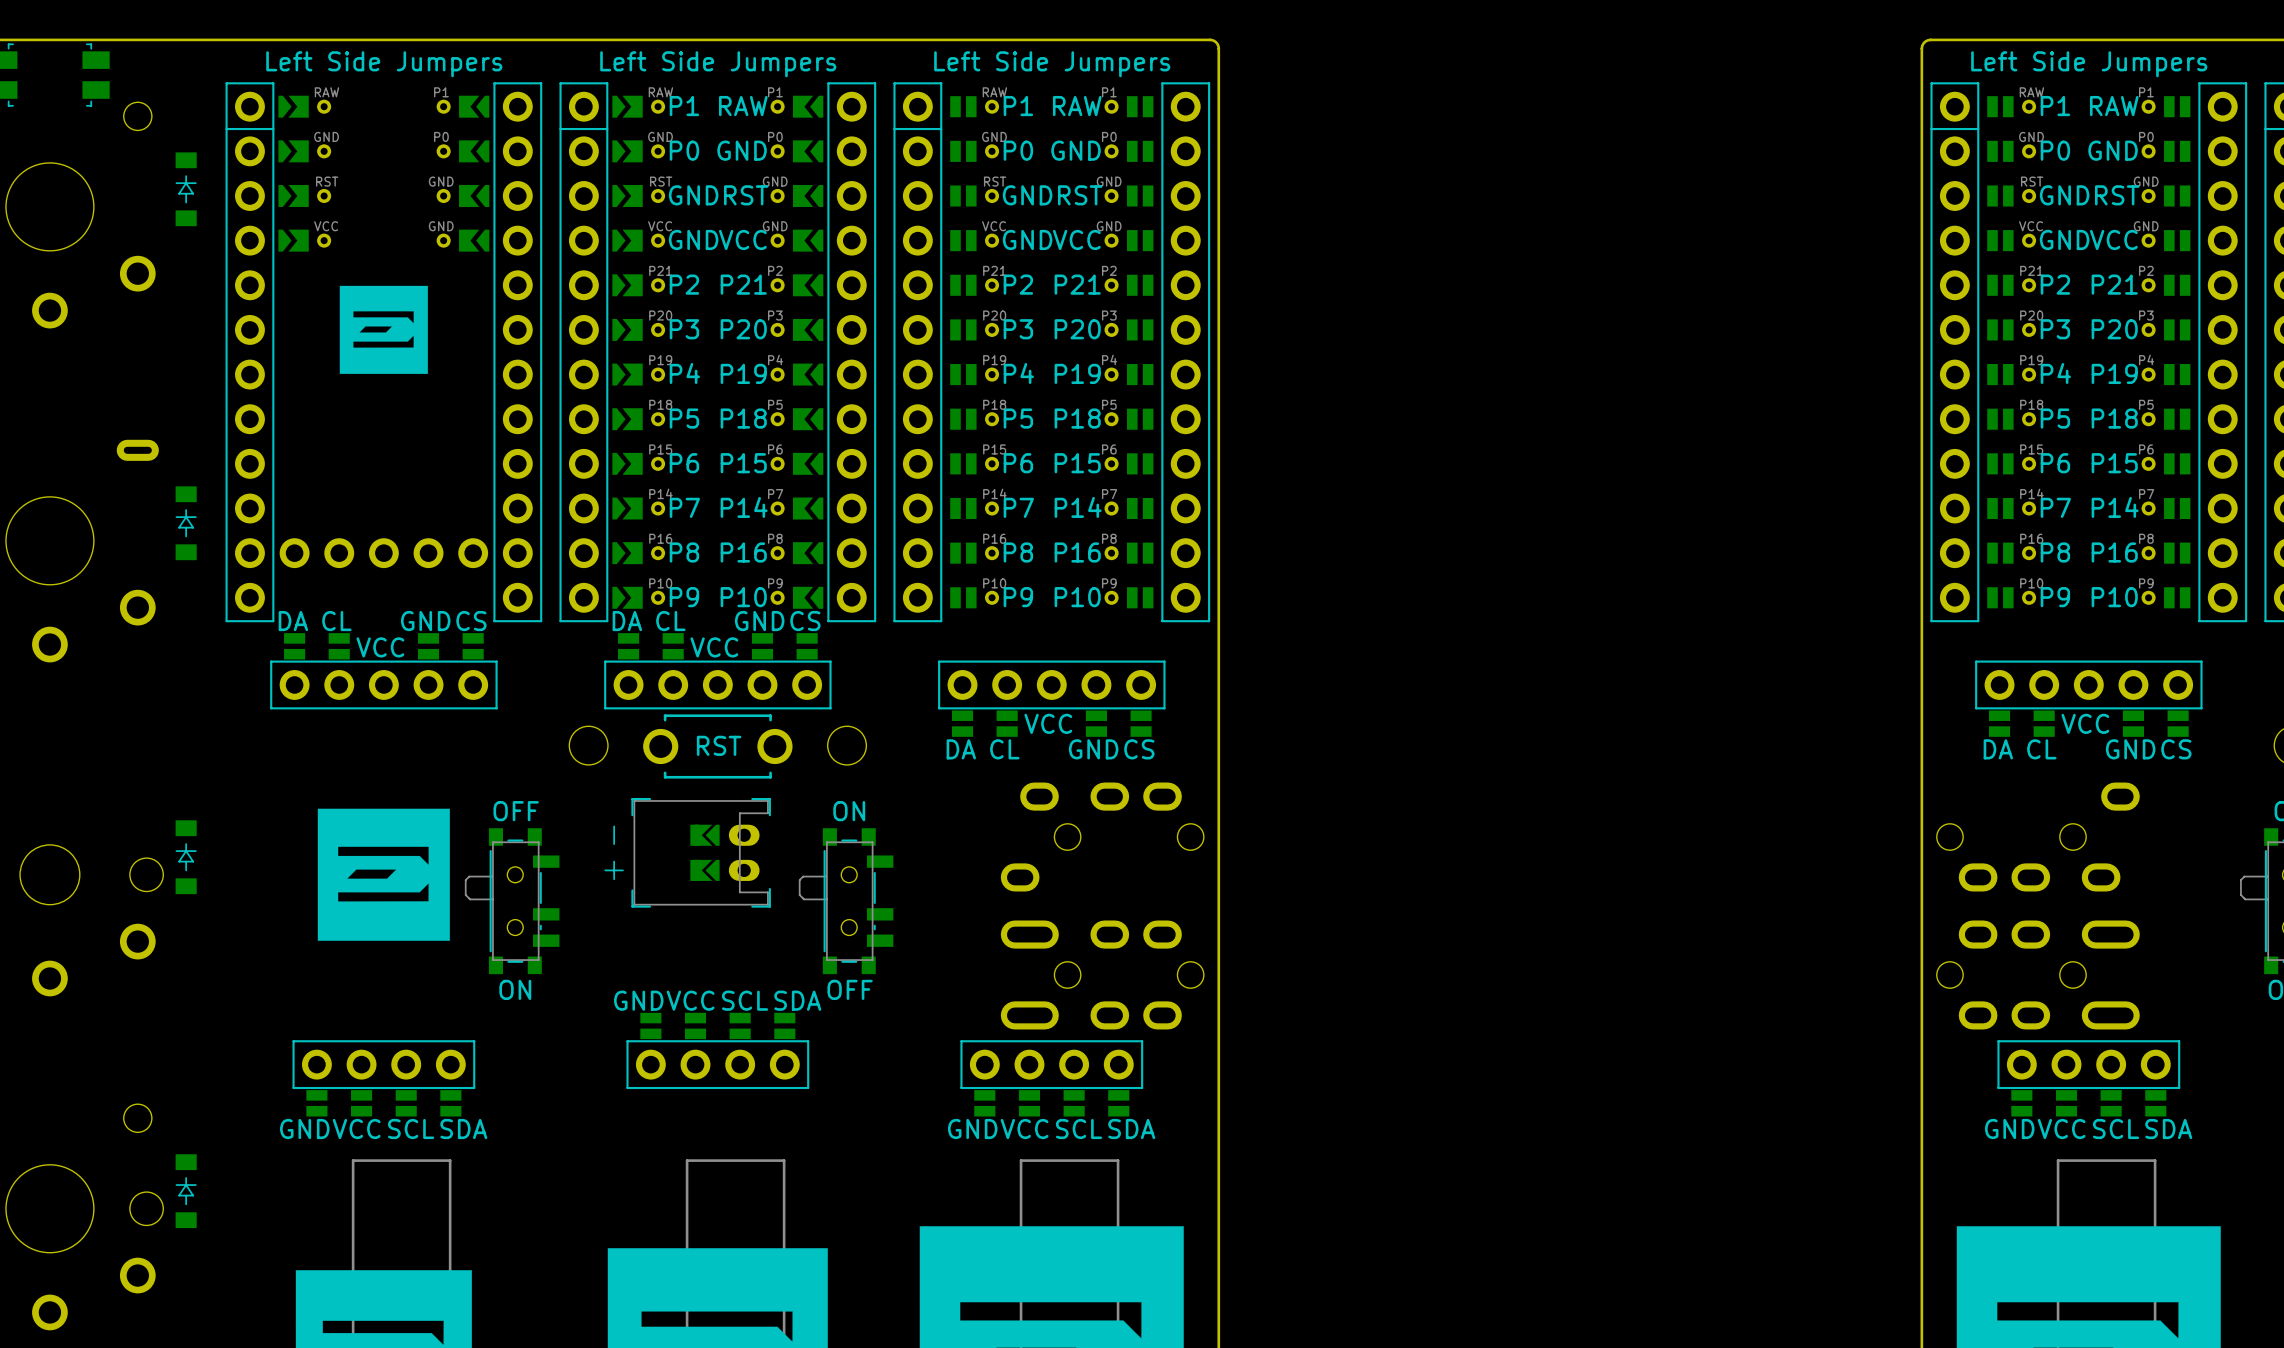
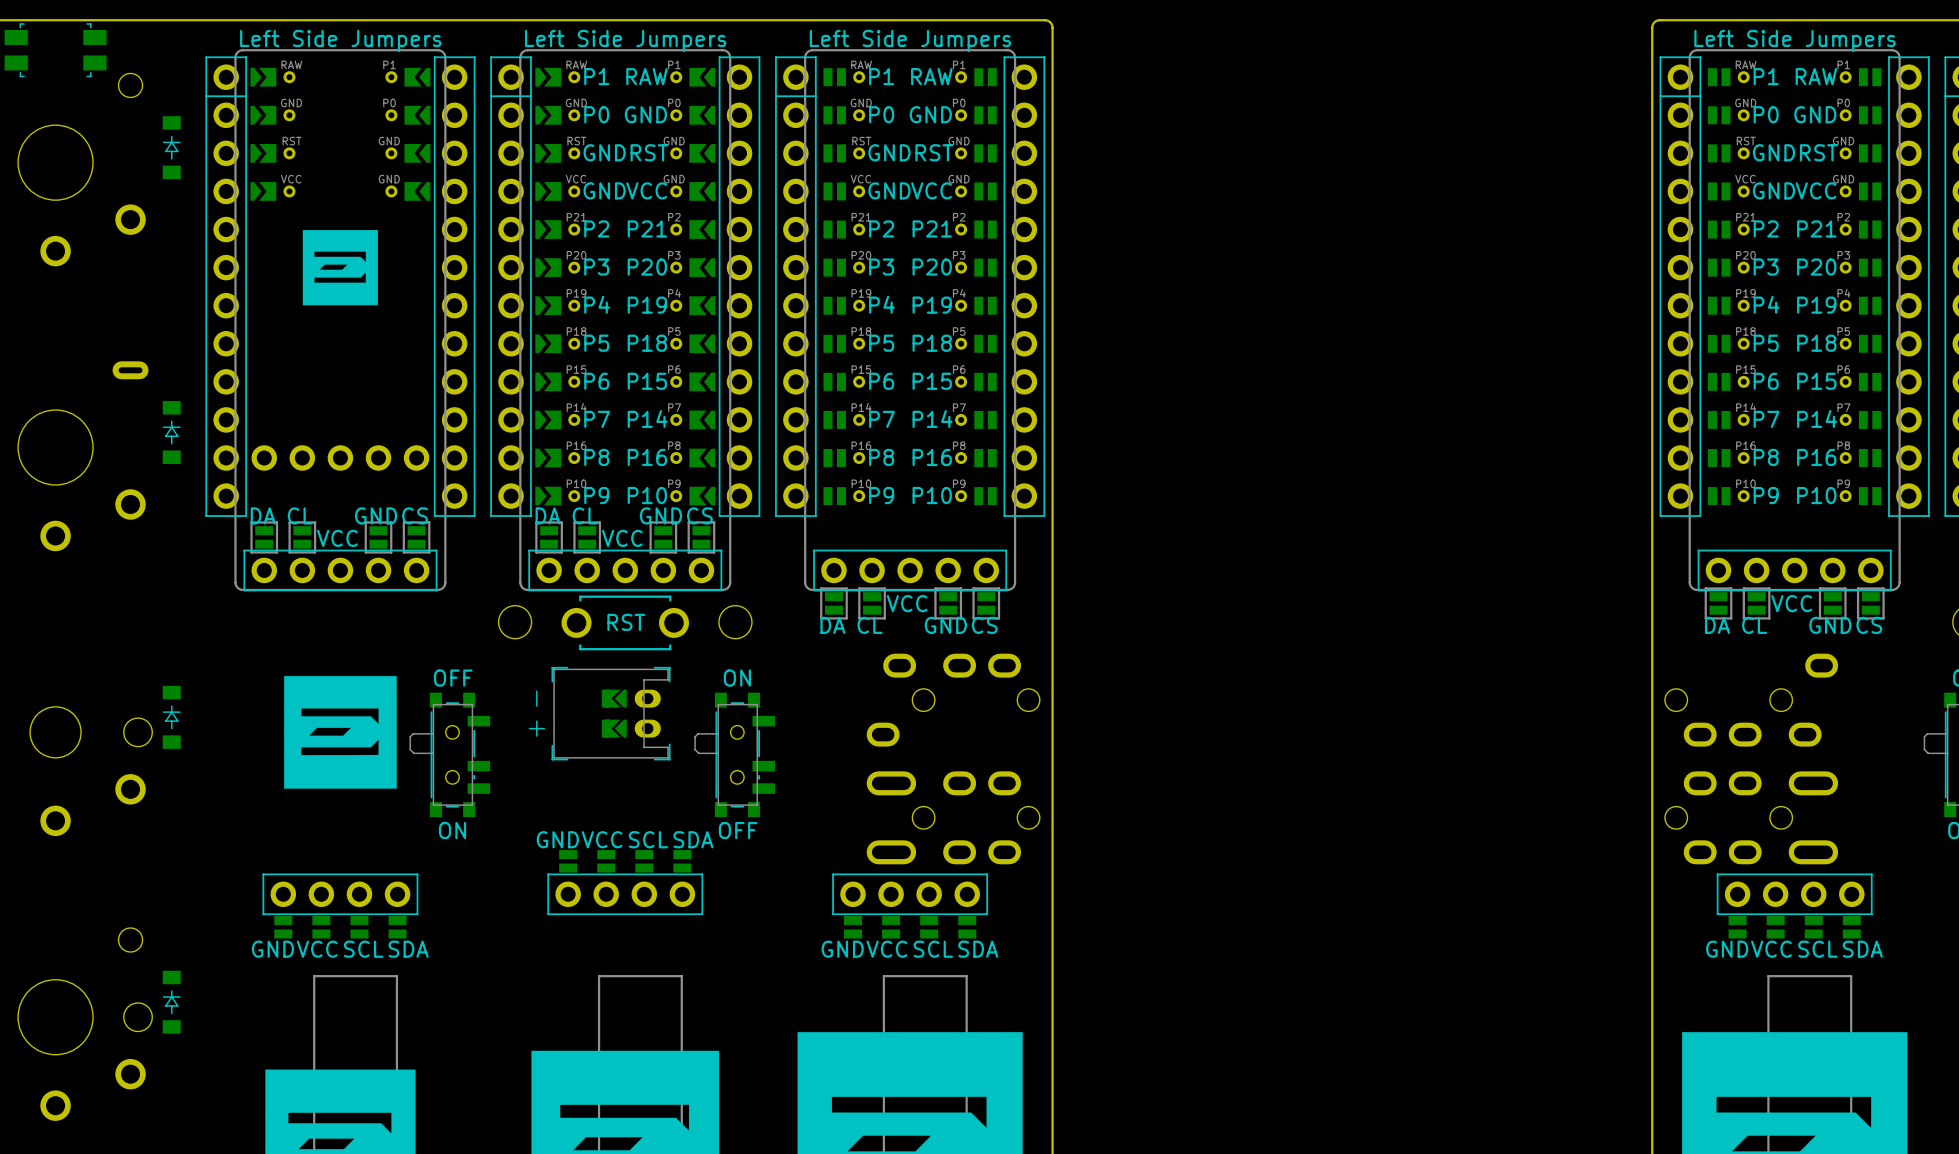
part: none -> (340, 320)
part: none -> (625, 320)
part: none -> (910, 334)
part: none -> (1794, 334)
part: (383, 671) -> none
part: (717, 671) -> none
part: (1051, 698) -> none
part: (2088, 698) -> none

